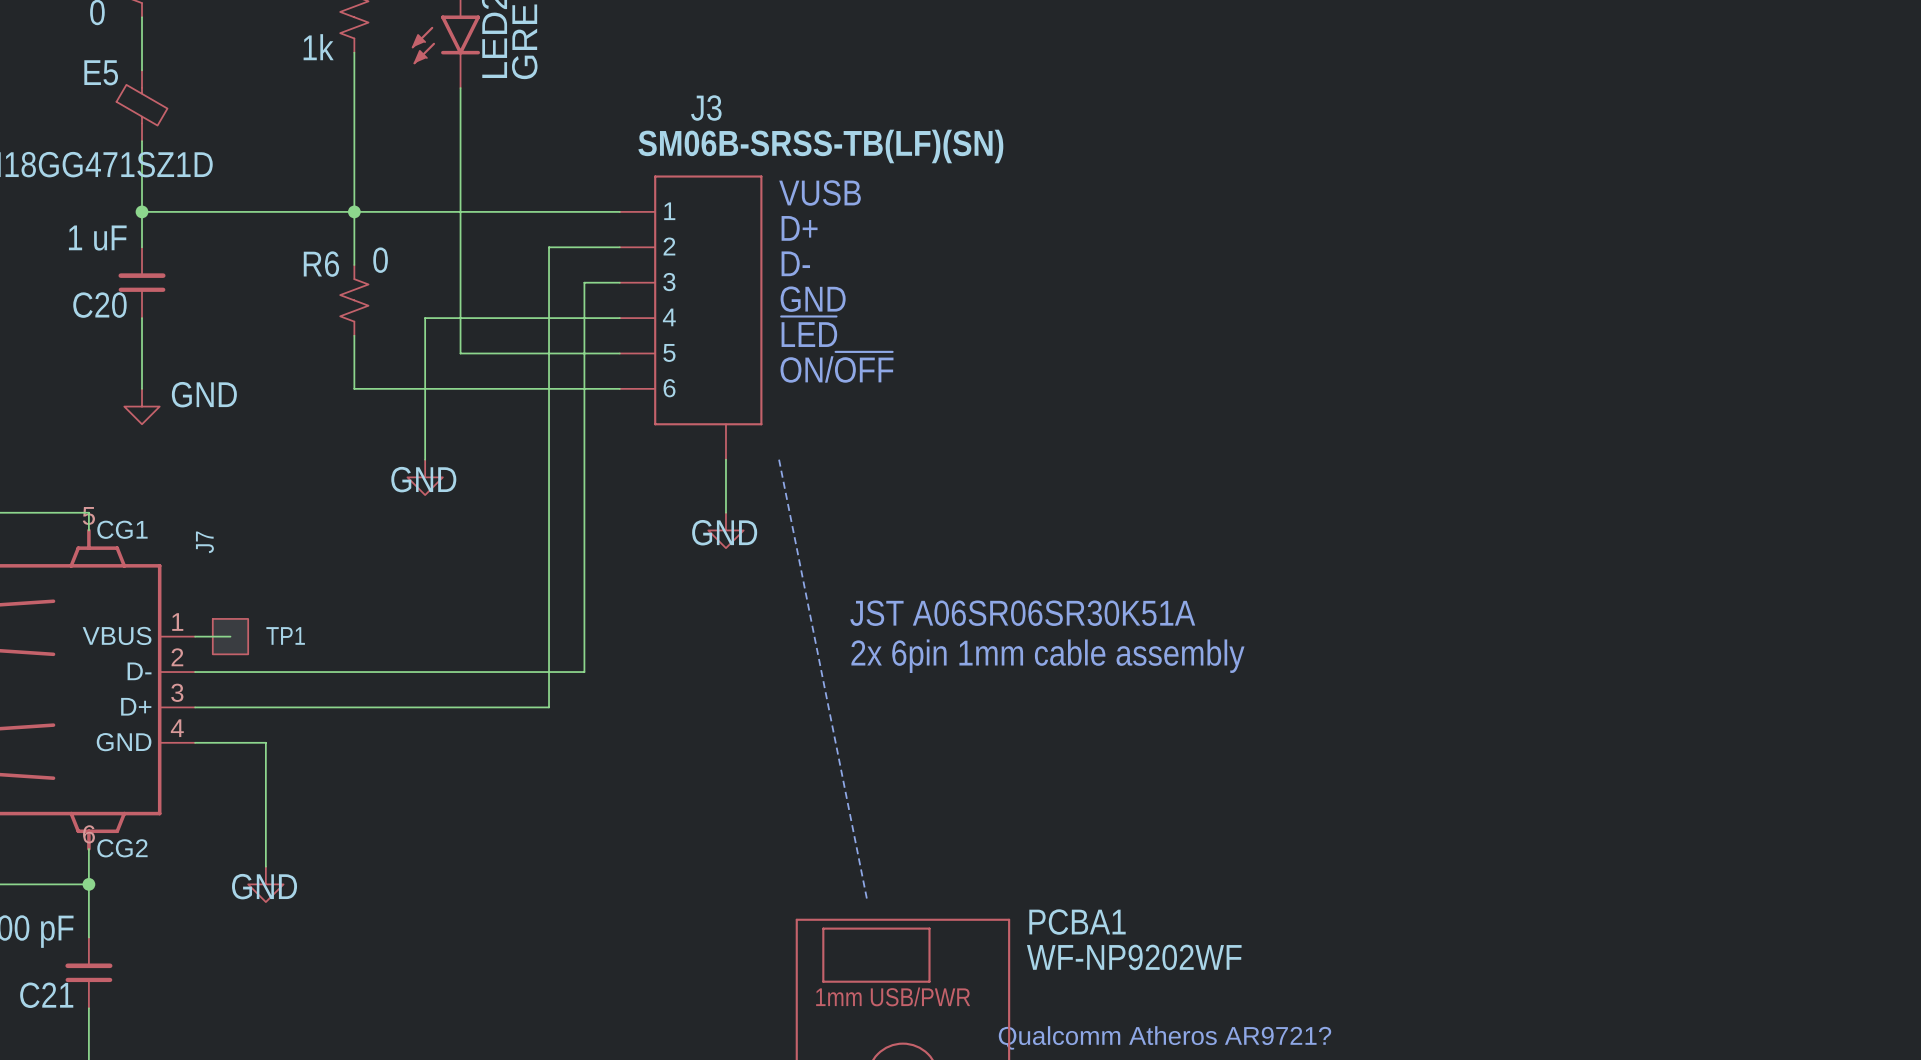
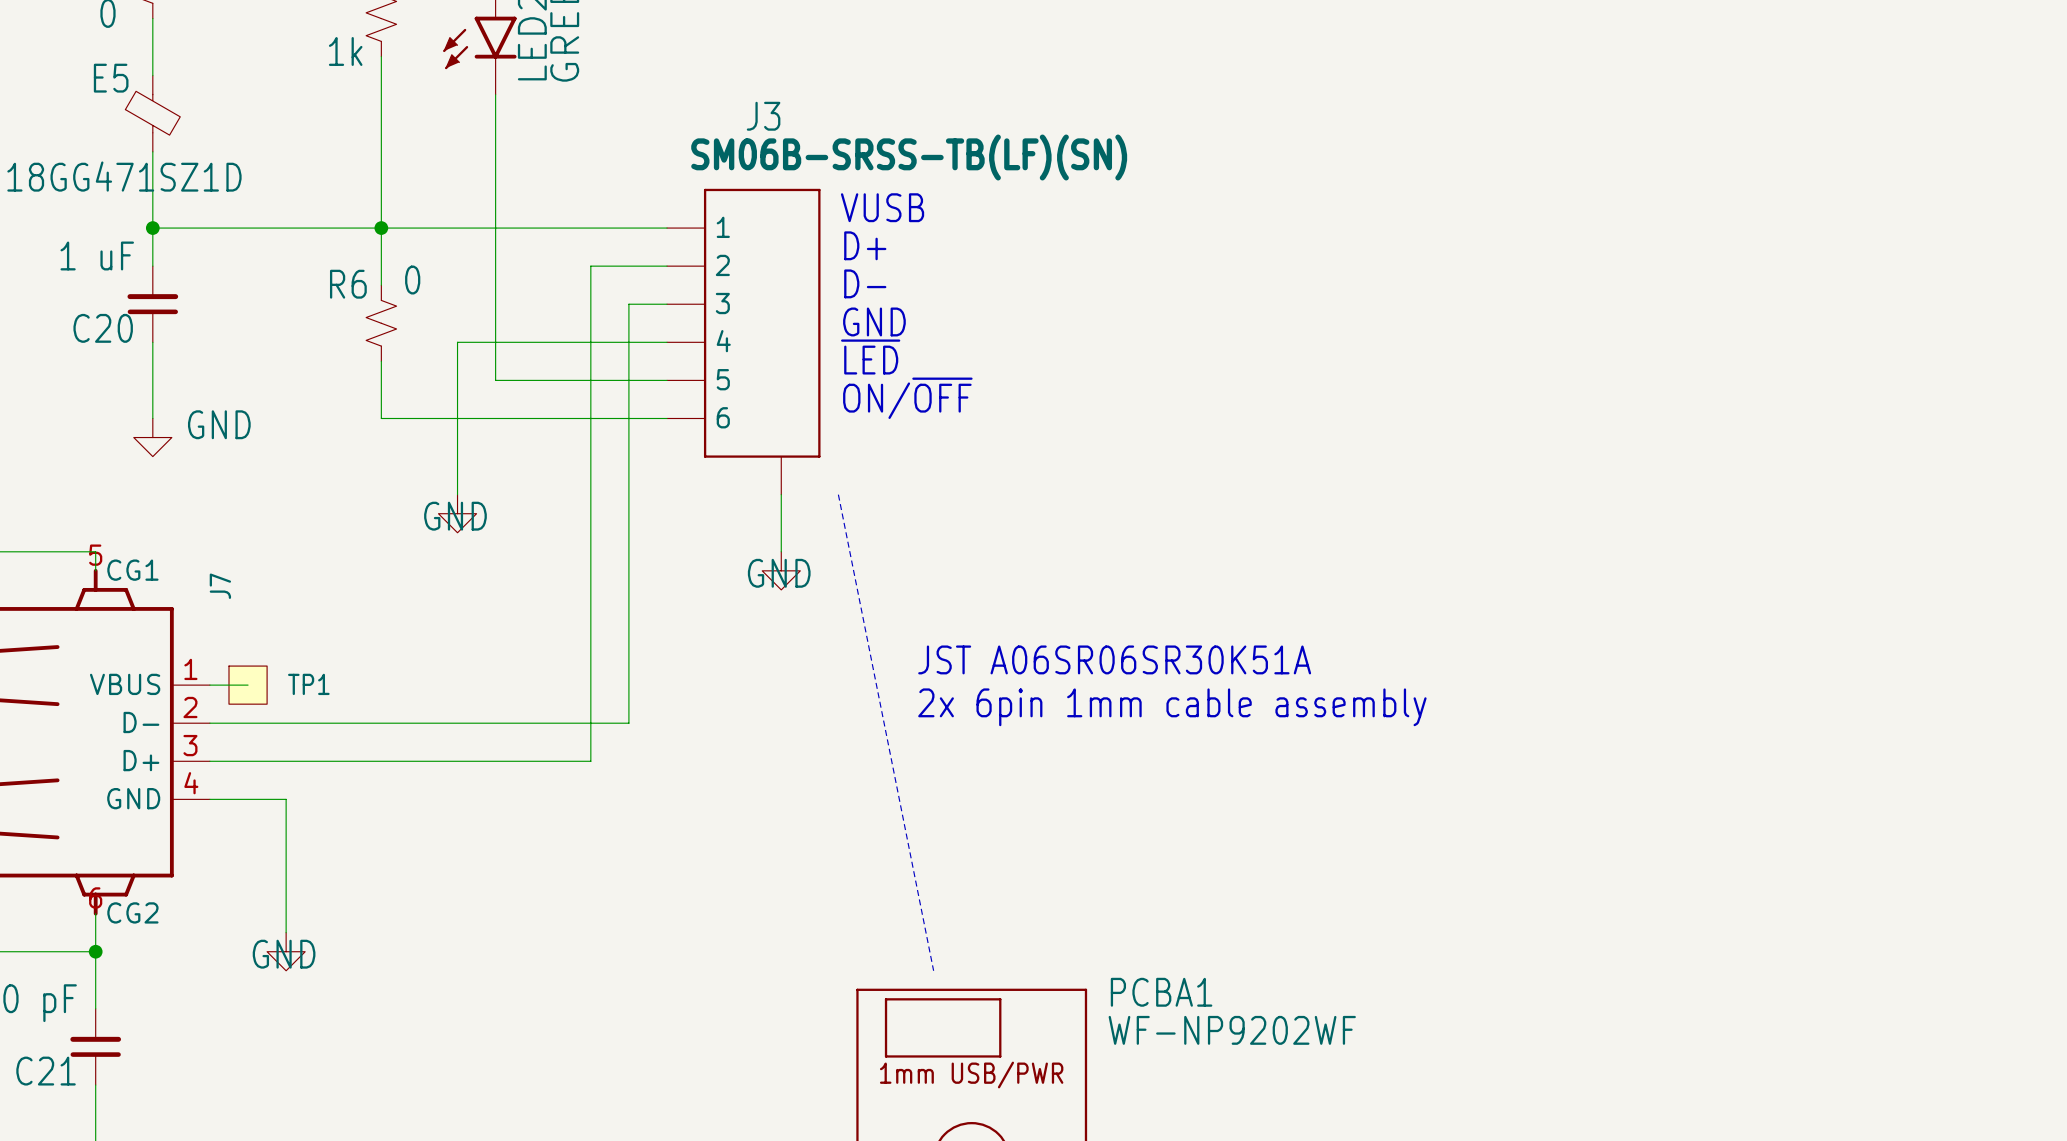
text: Qualcomm Atheros AR9721? (1164, 1037) -> none

